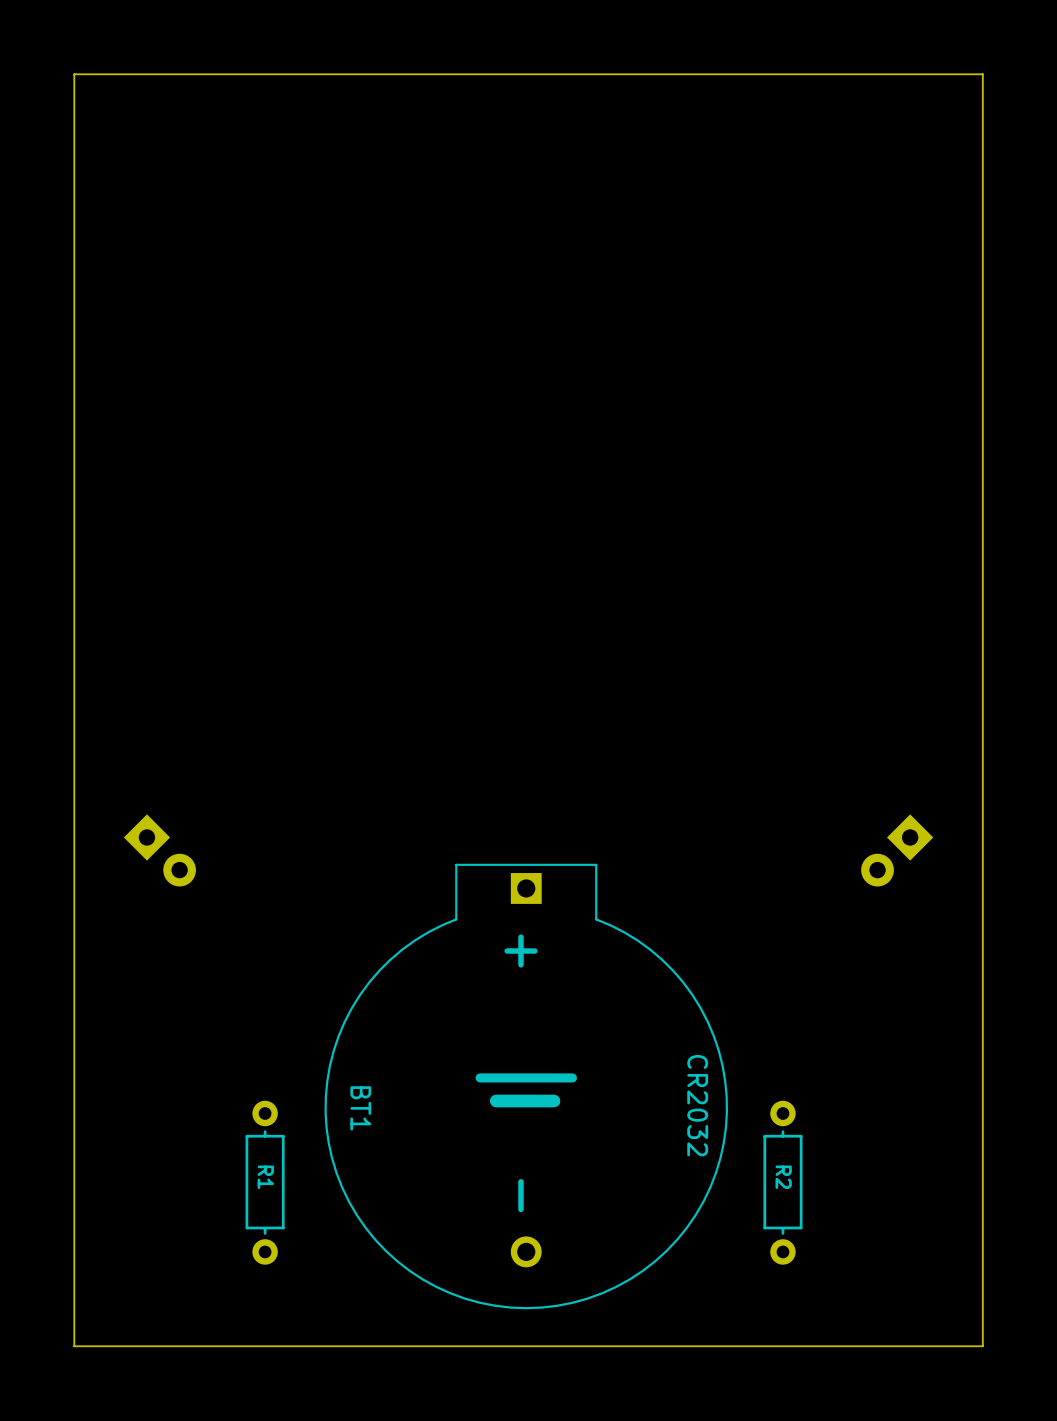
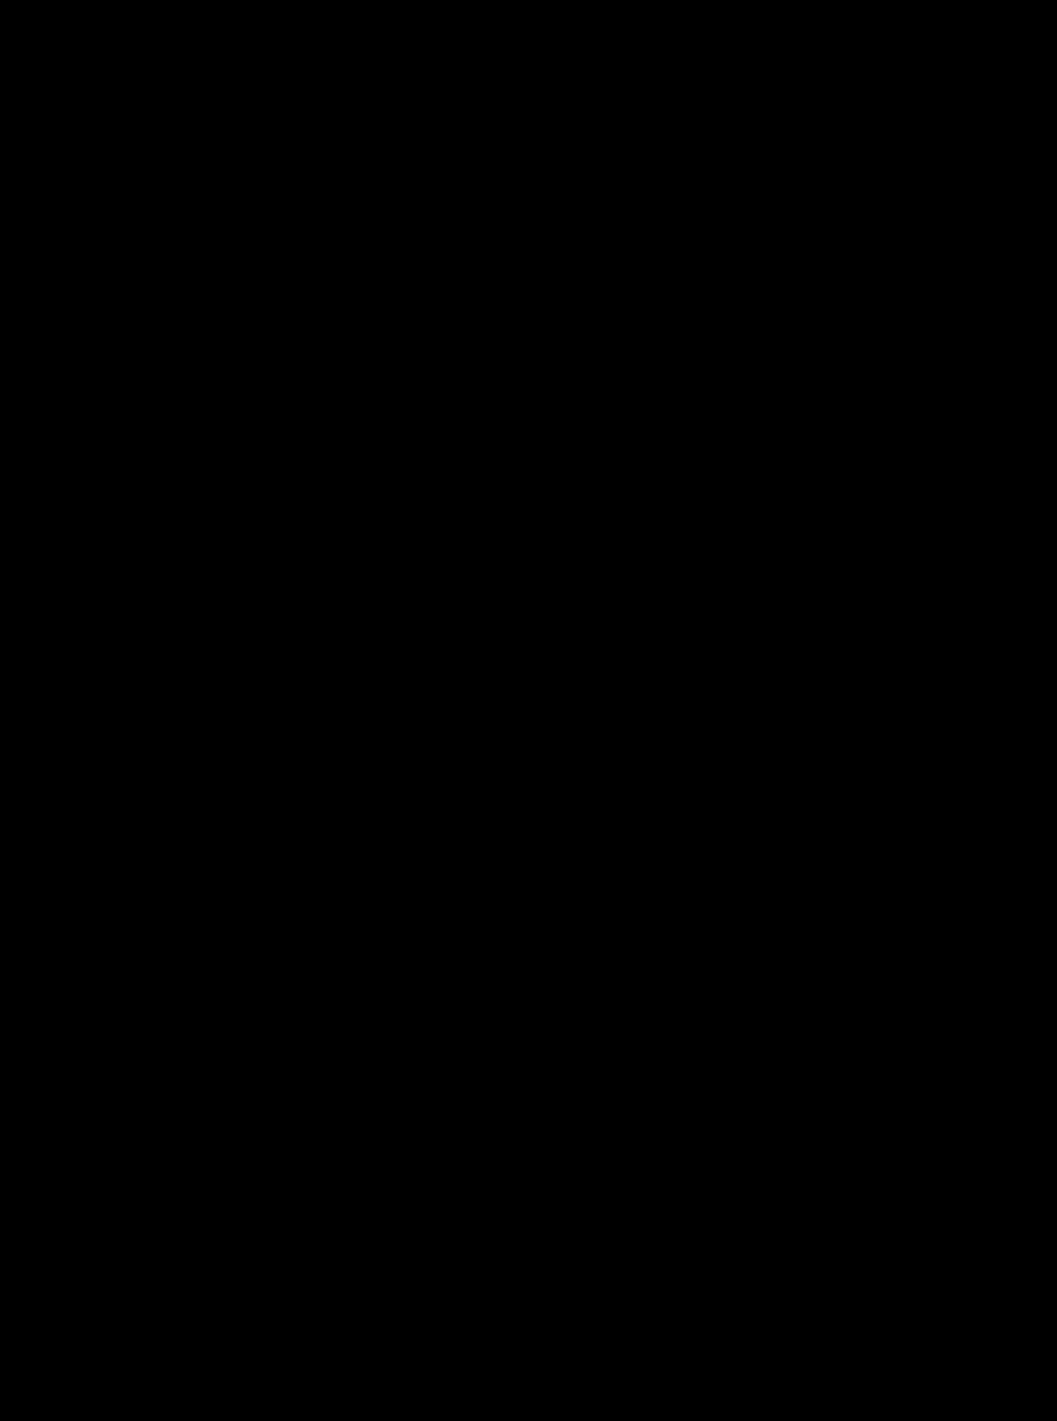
board edge: (982, 74) (982, 1346) (74, 1346) (74, 74) (982, 74) -> none
part: (159, 850) -> none
part: (897, 850) -> none
BT1: (526, 1086) -> none
R1: (265, 1182) -> none
R2: (782, 1182) -> none

